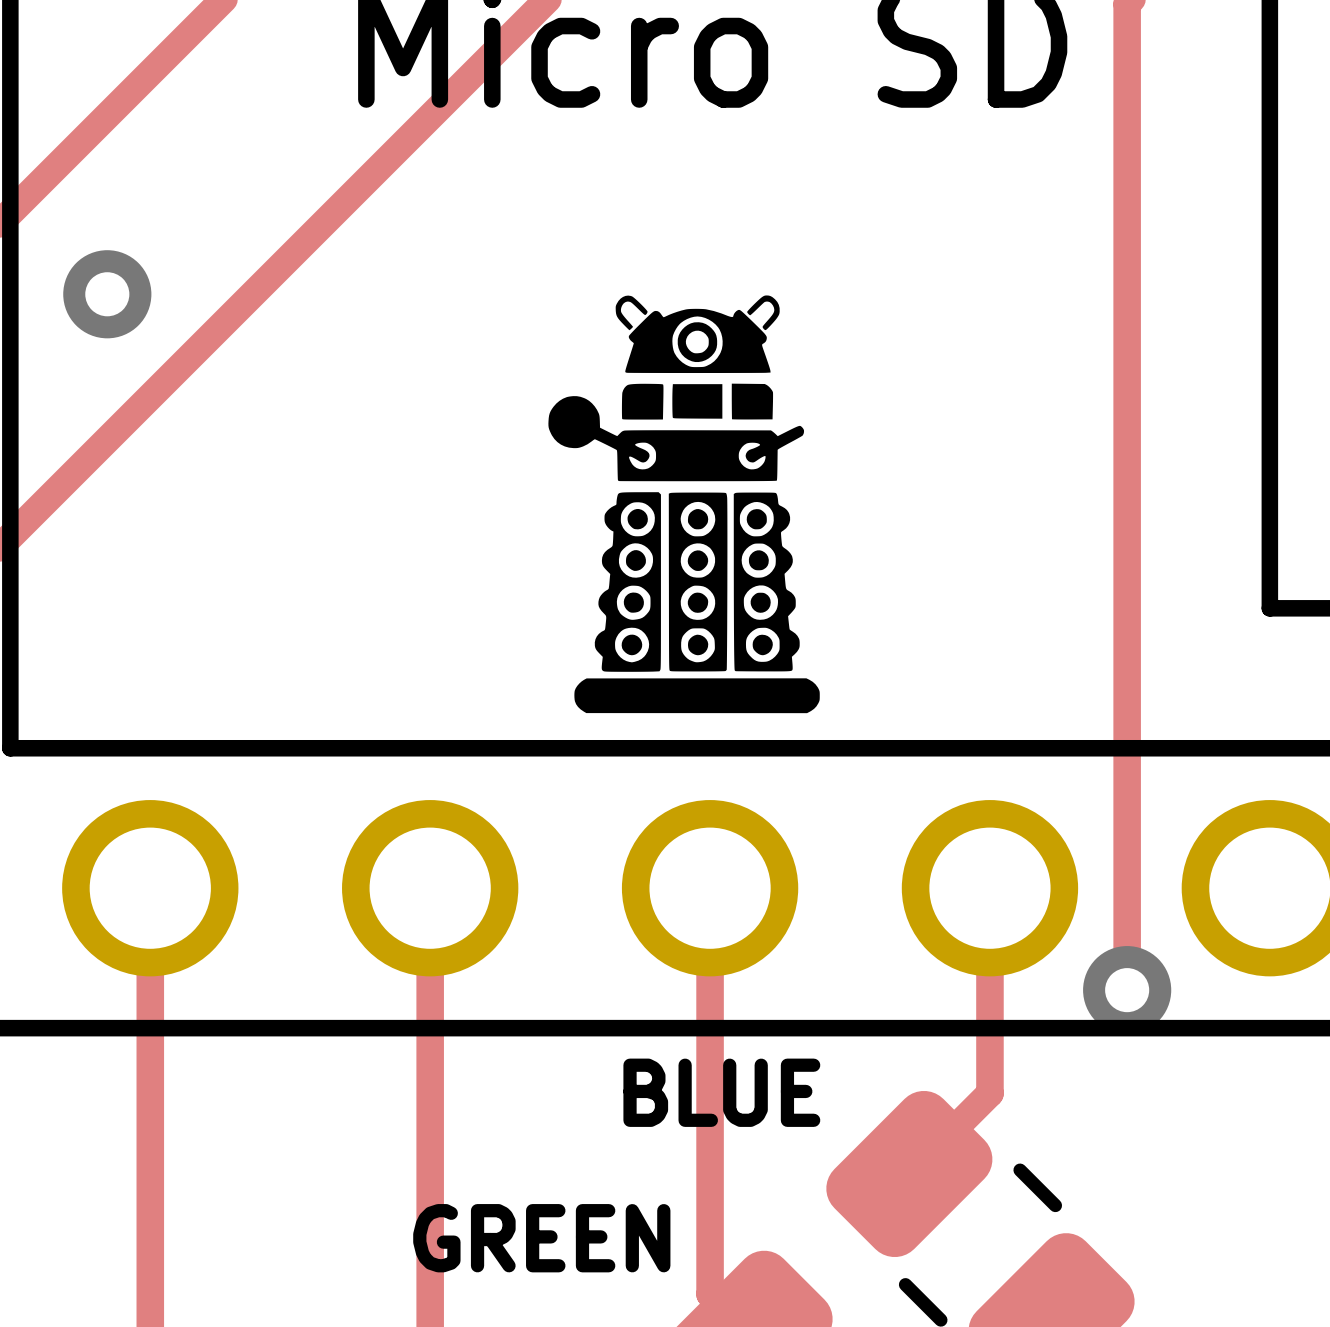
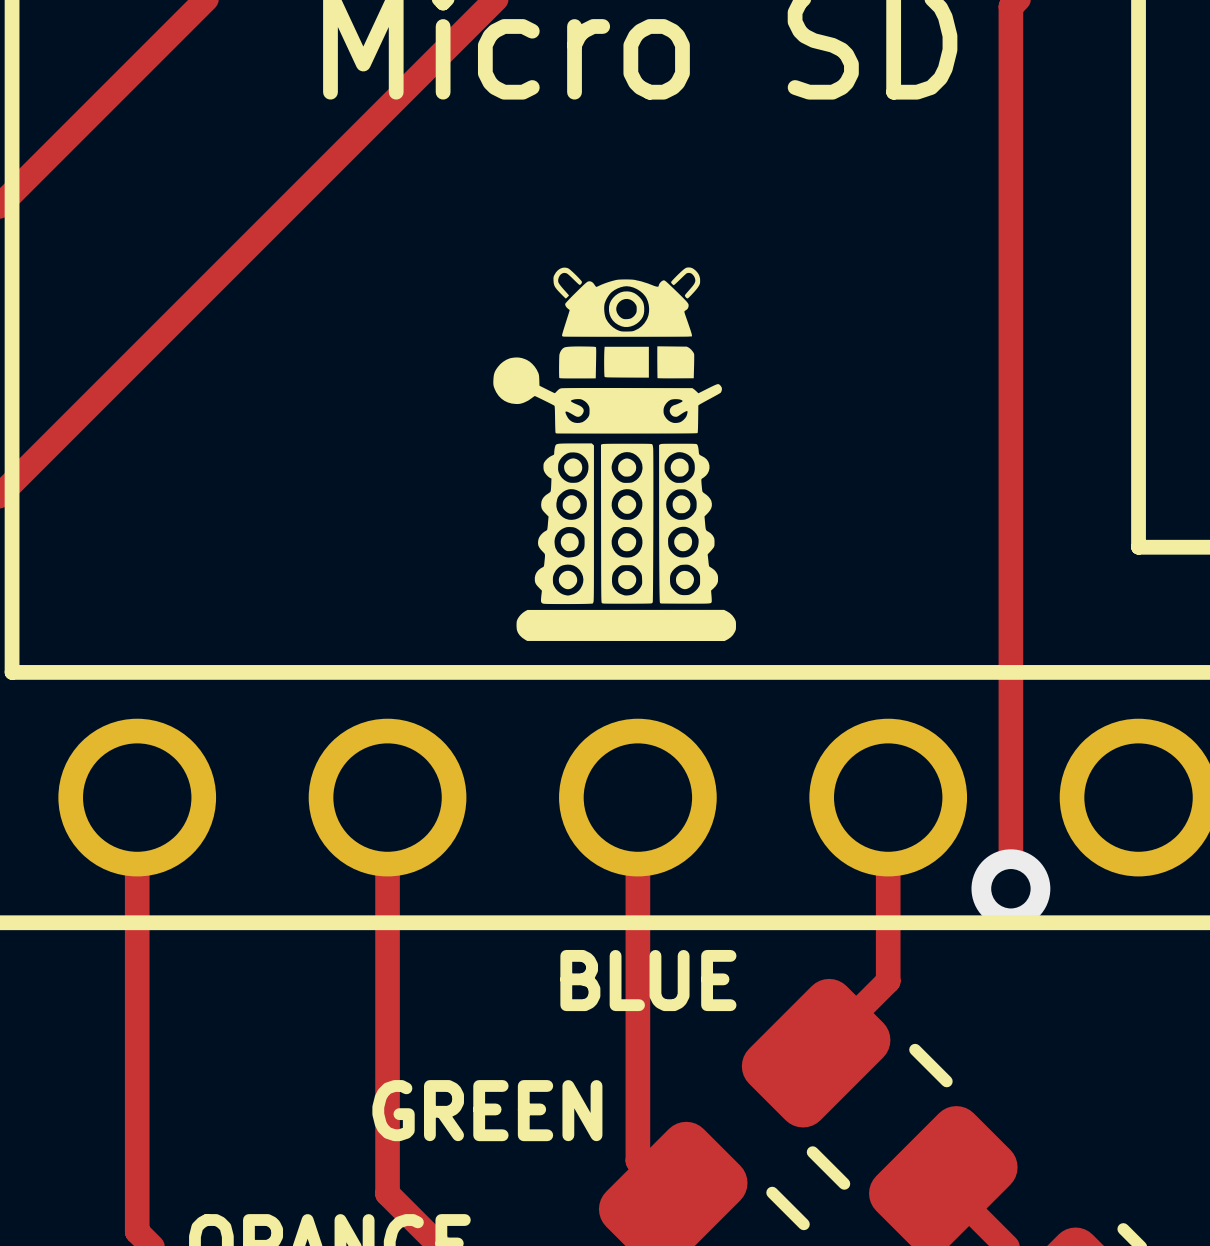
via: (107, 294) -> none

